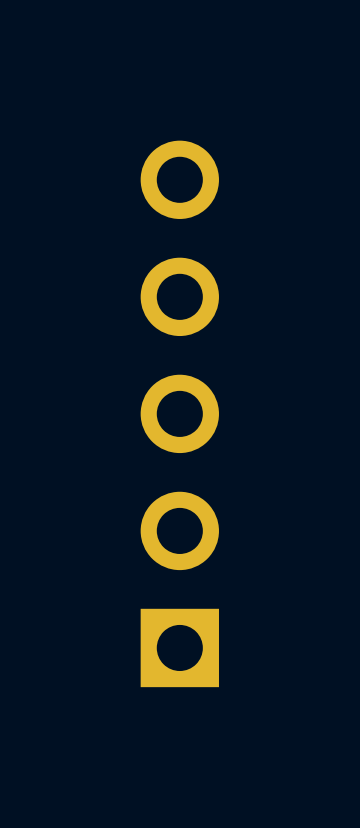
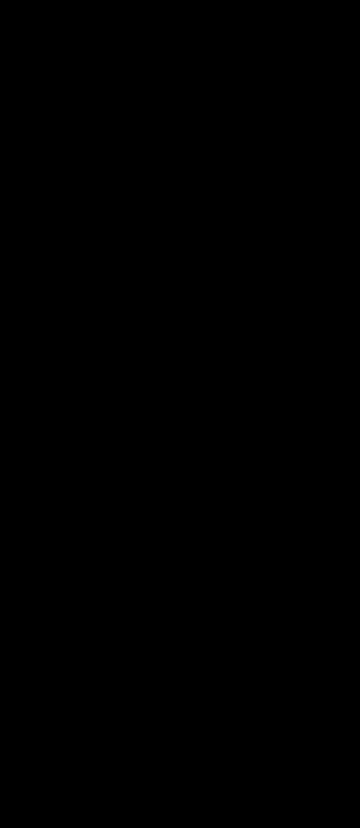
part: (179, 413) -> none

